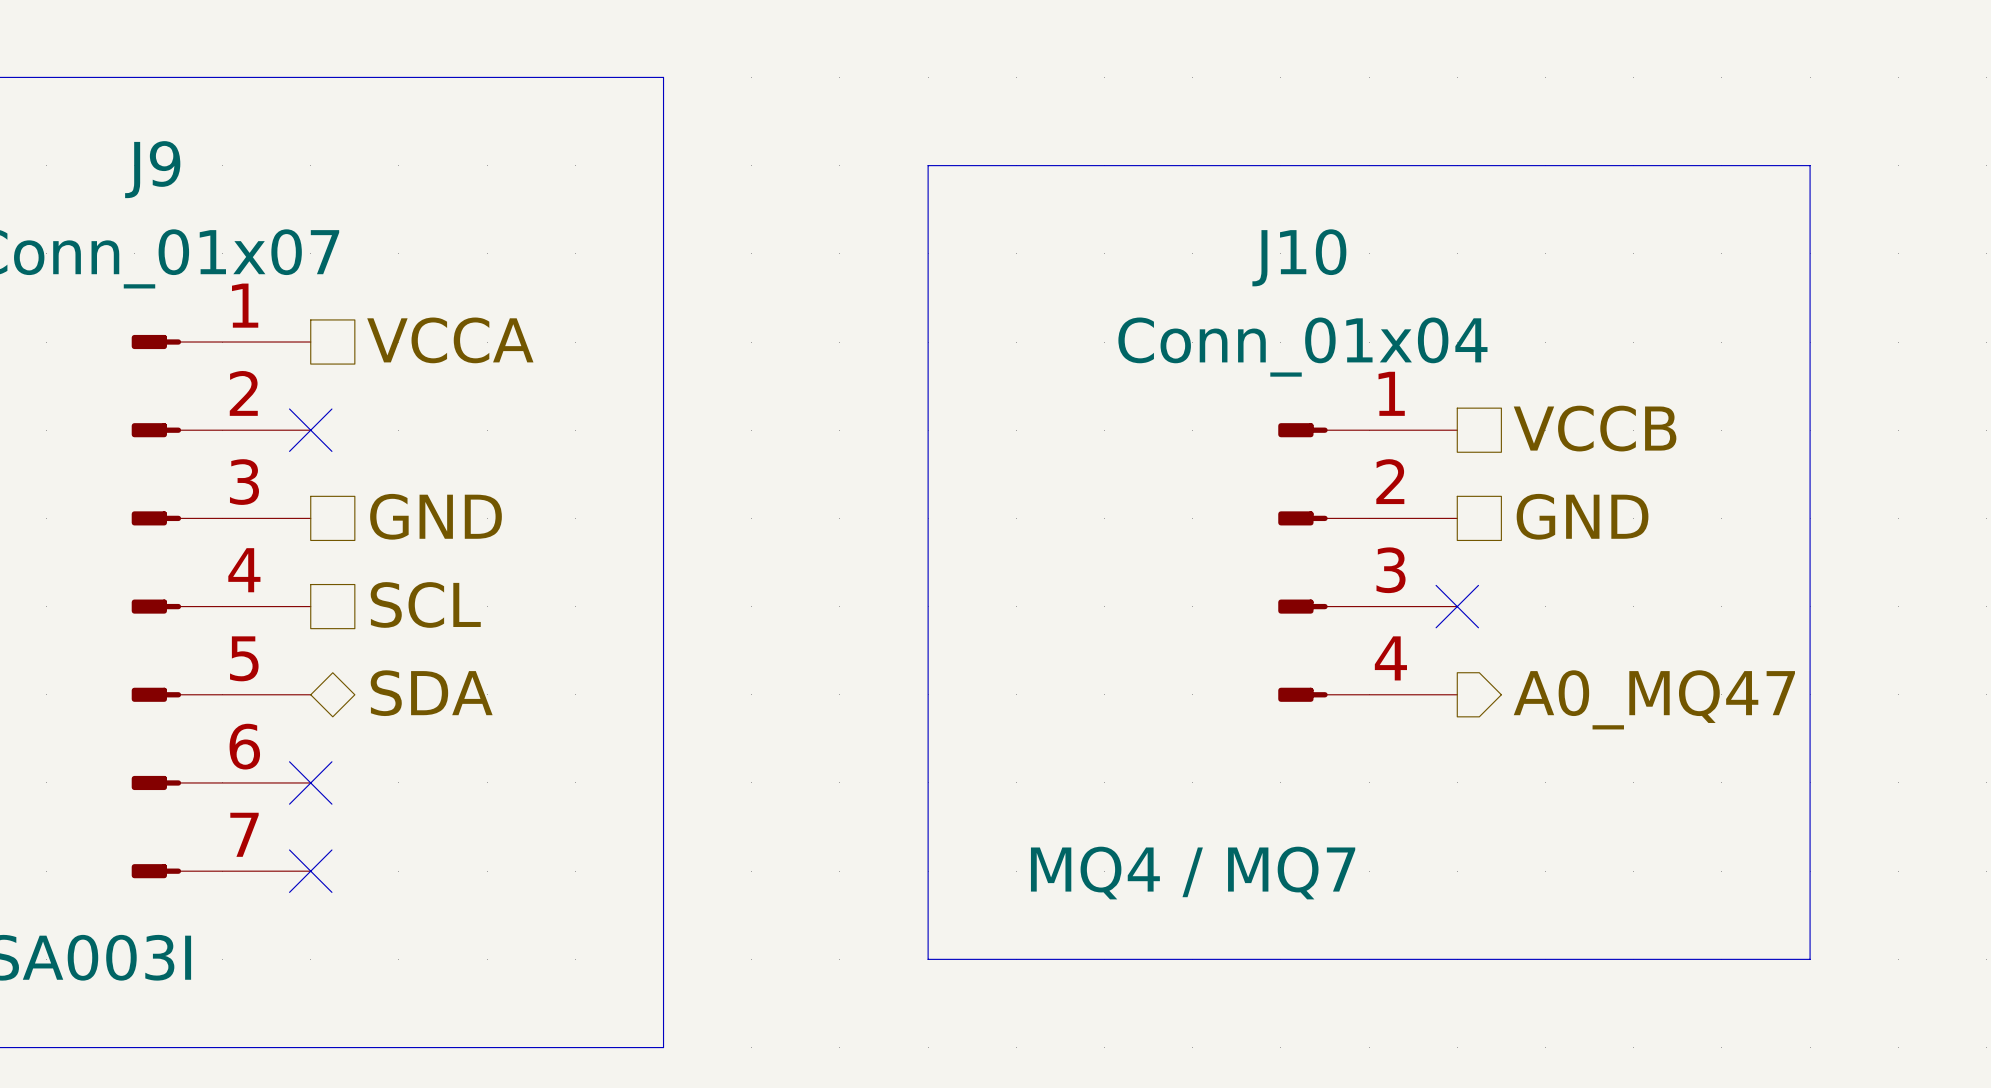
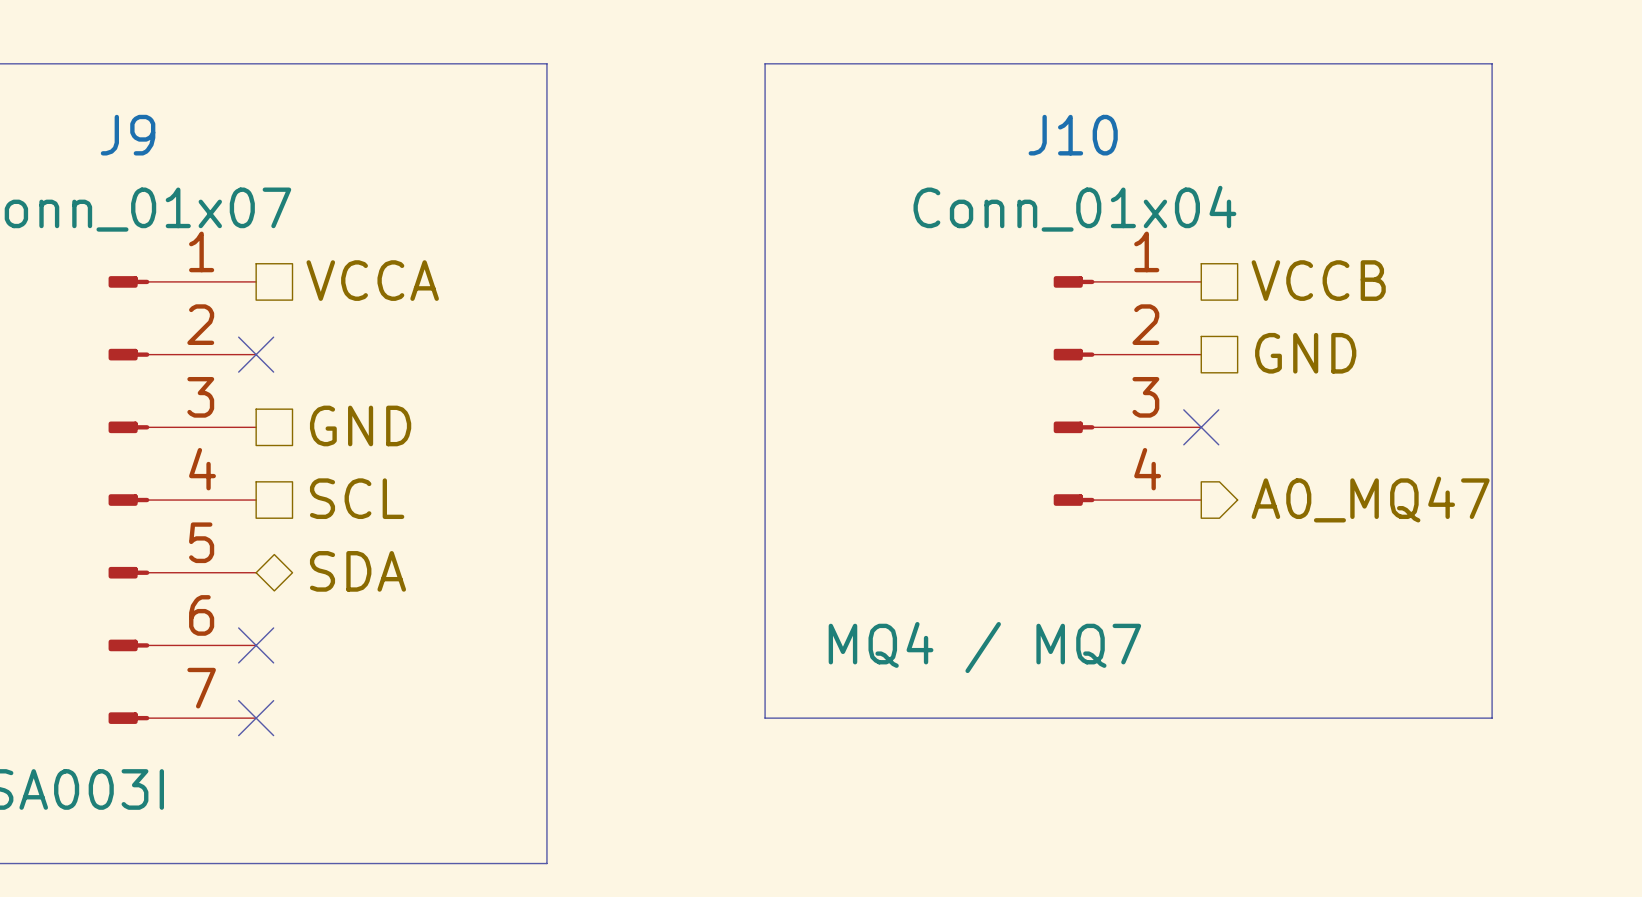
line: (928, 165) (1810, 165) -> (765, 136) (765, 63) (1492, 63) (1492, 136)
hierarchical label: none -> VCCB (1318, 280)
hierarchical label: VCCB (1595, 428) -> GND (1305, 353)
hierarchical label: GND (1582, 516) -> none
J10 position: (1367, 562) -> (1127, 390)
no-connect mark position: (1457, 606) -> (1201, 427)
hierarchical label position: A0_MQ47 (1654, 699) -> A0_MQ47 (1370, 499)
line: (928, 871) (928, 959) (1810, 959) (1810, 871) -> (765, 718) (1492, 718)

